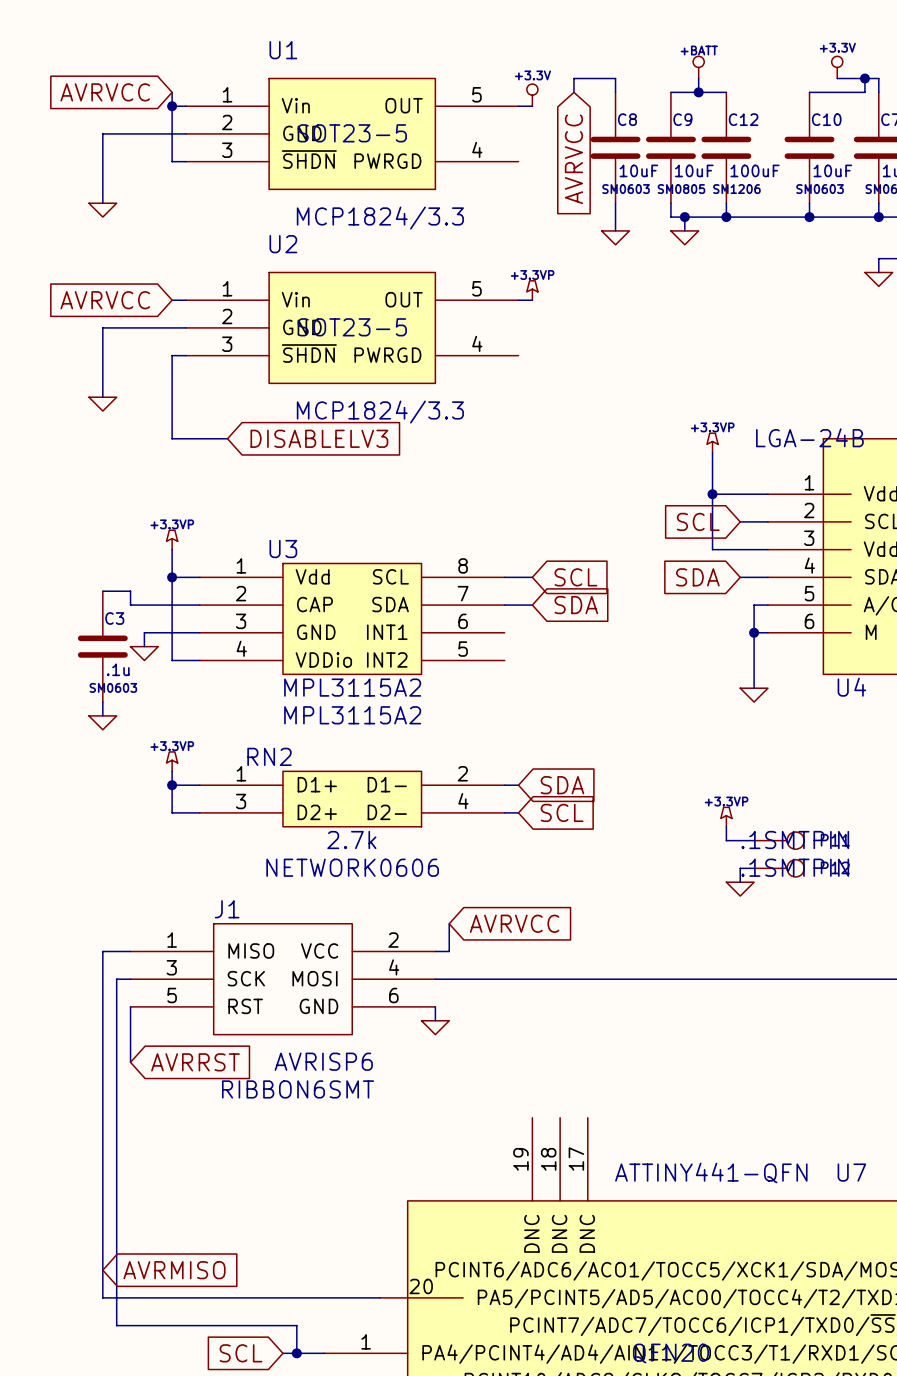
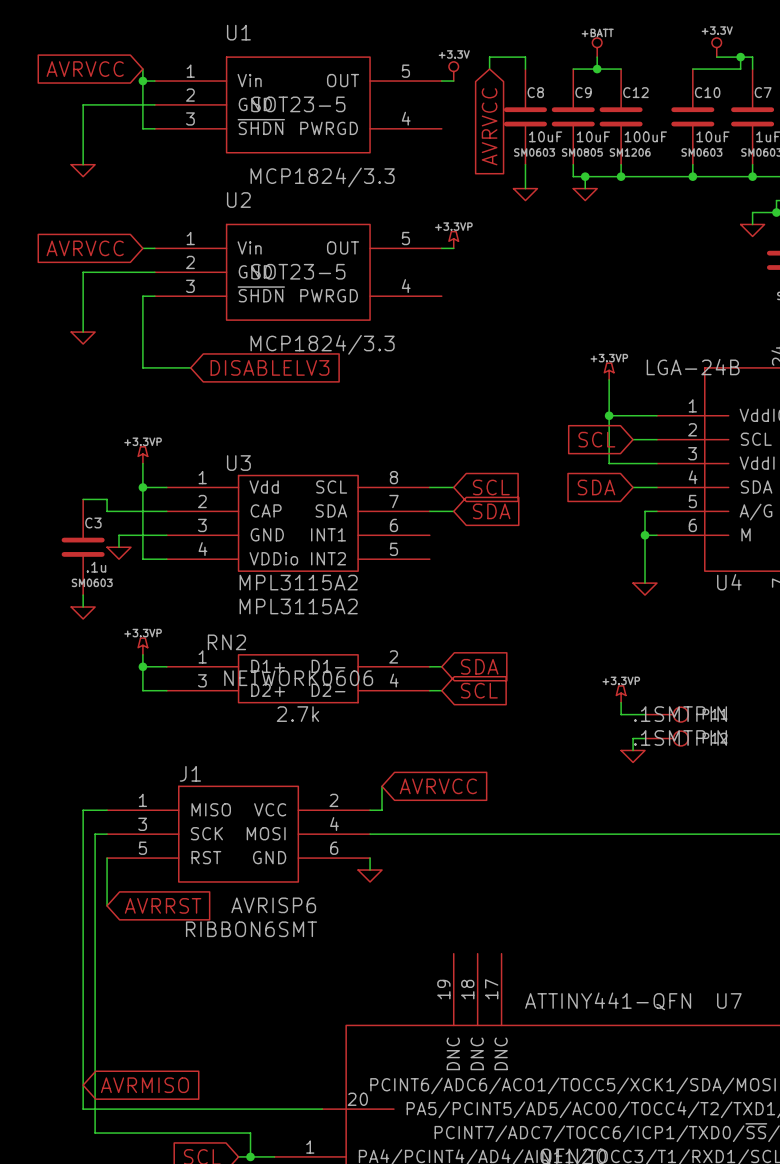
RN2 text position: NETWORK0606 (352, 867) -> NETWORK0606 (298, 678)

